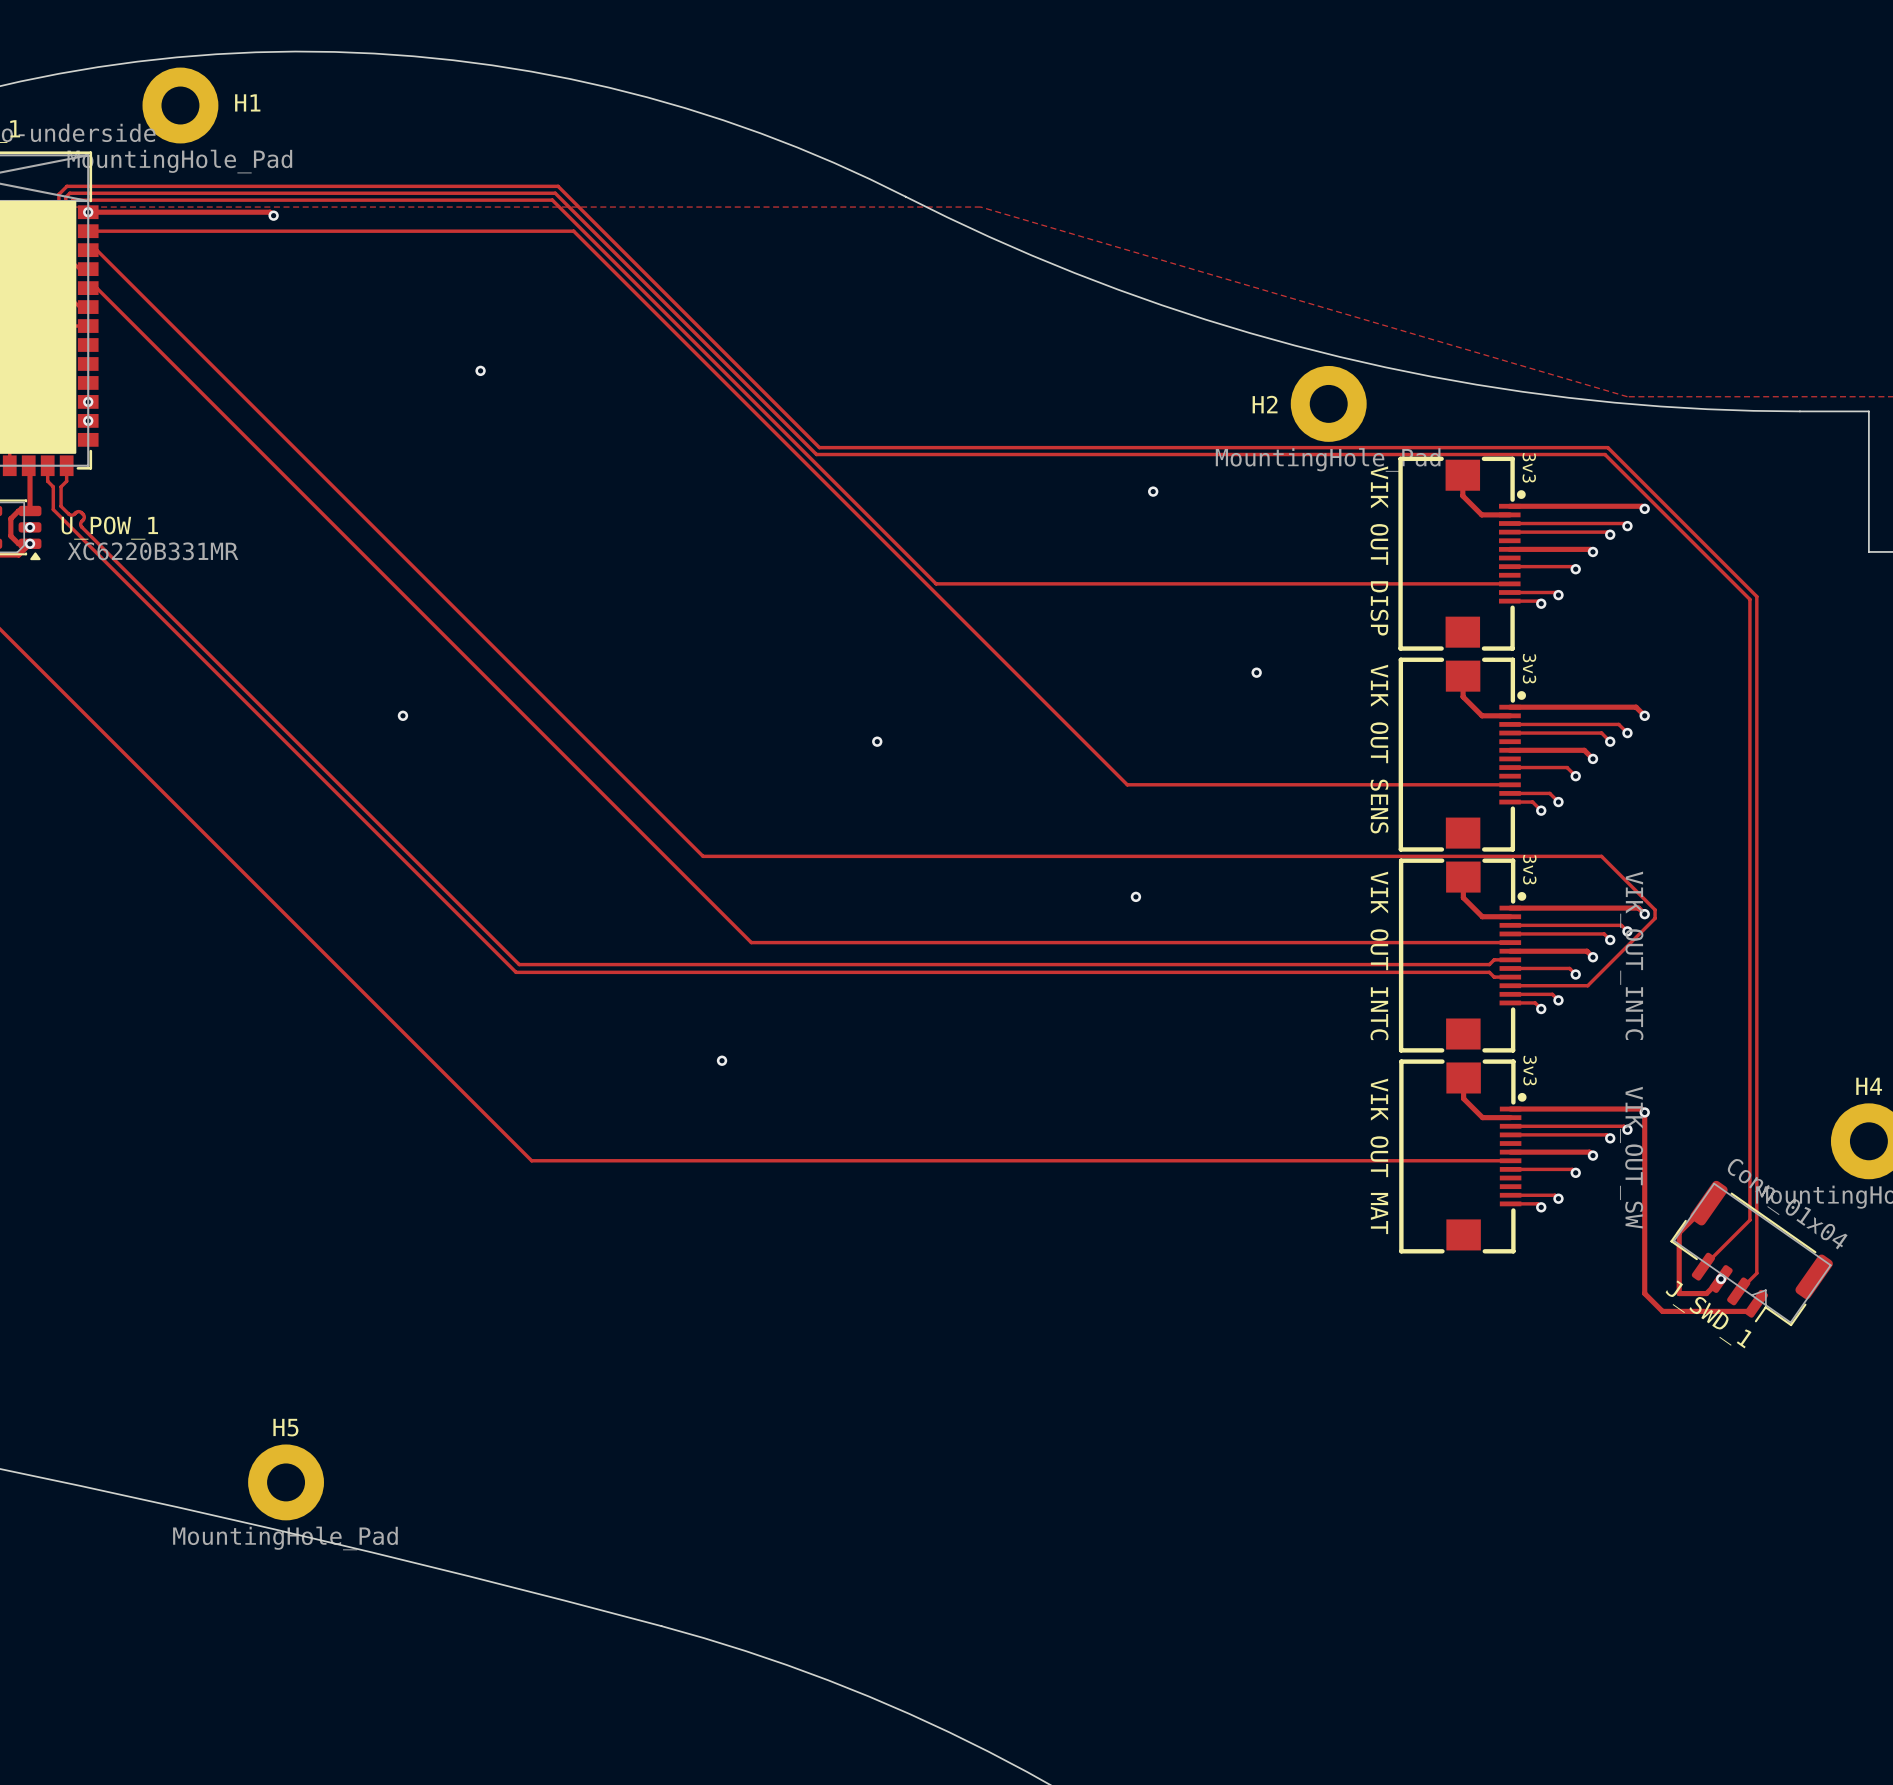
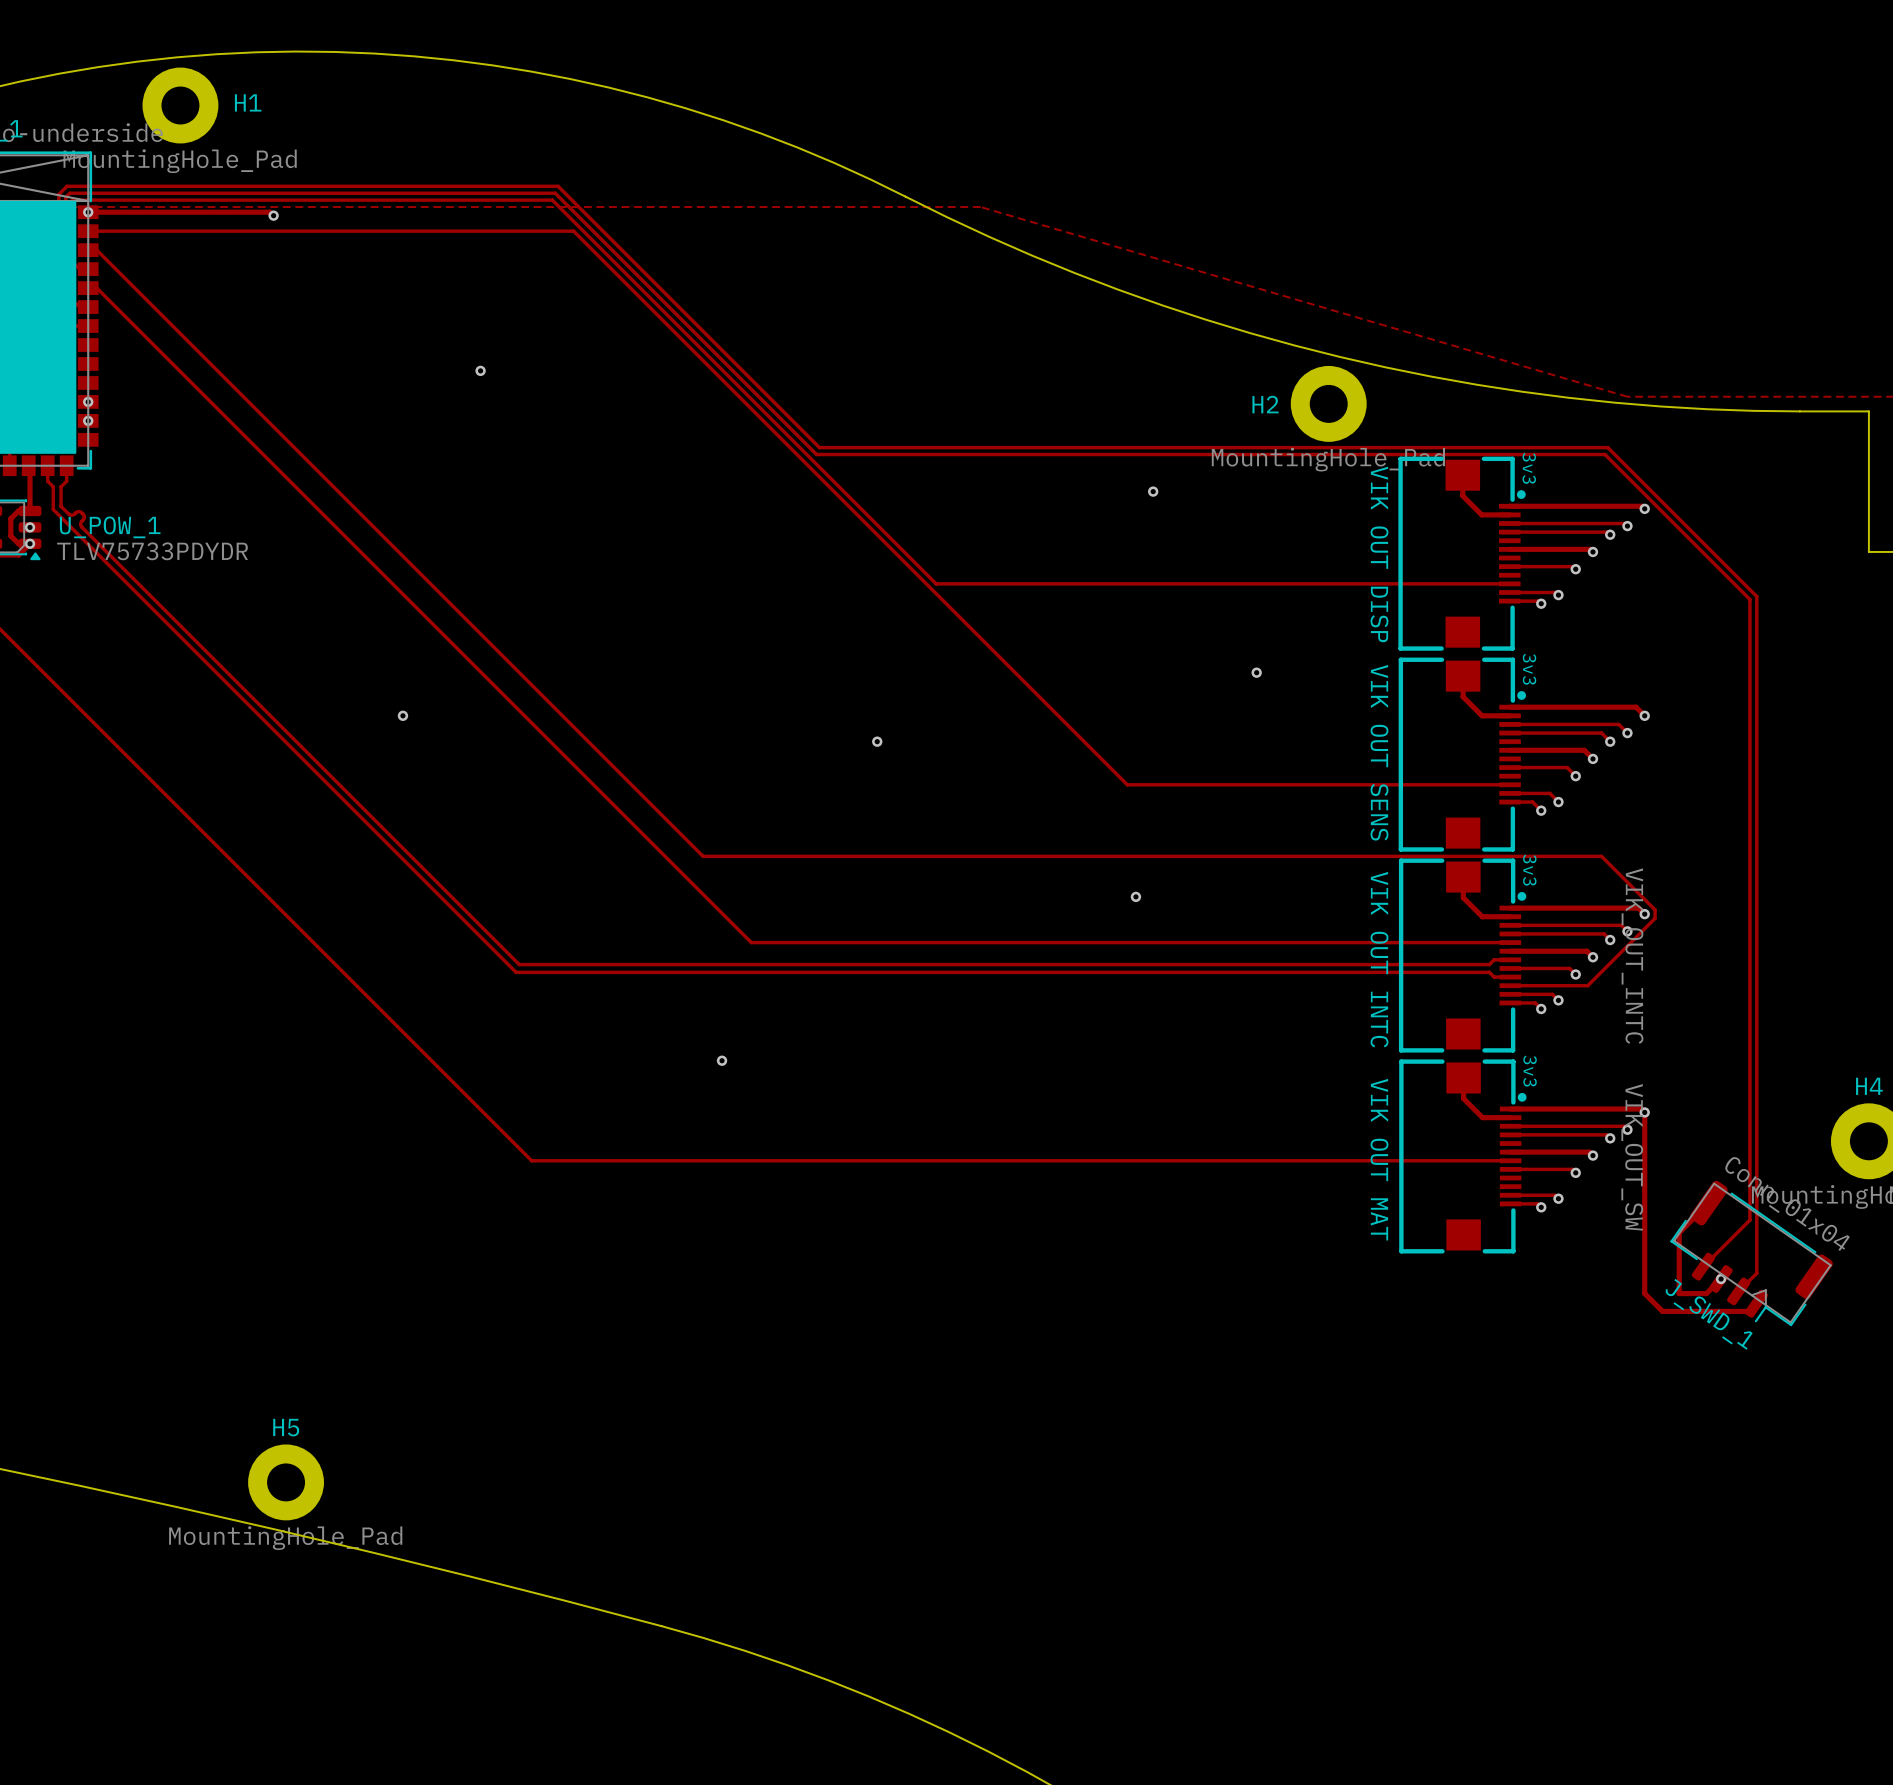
U_POW_1 value: XC6220B331MR (153, 551) -> TLV75733PDYDR (152, 551)

